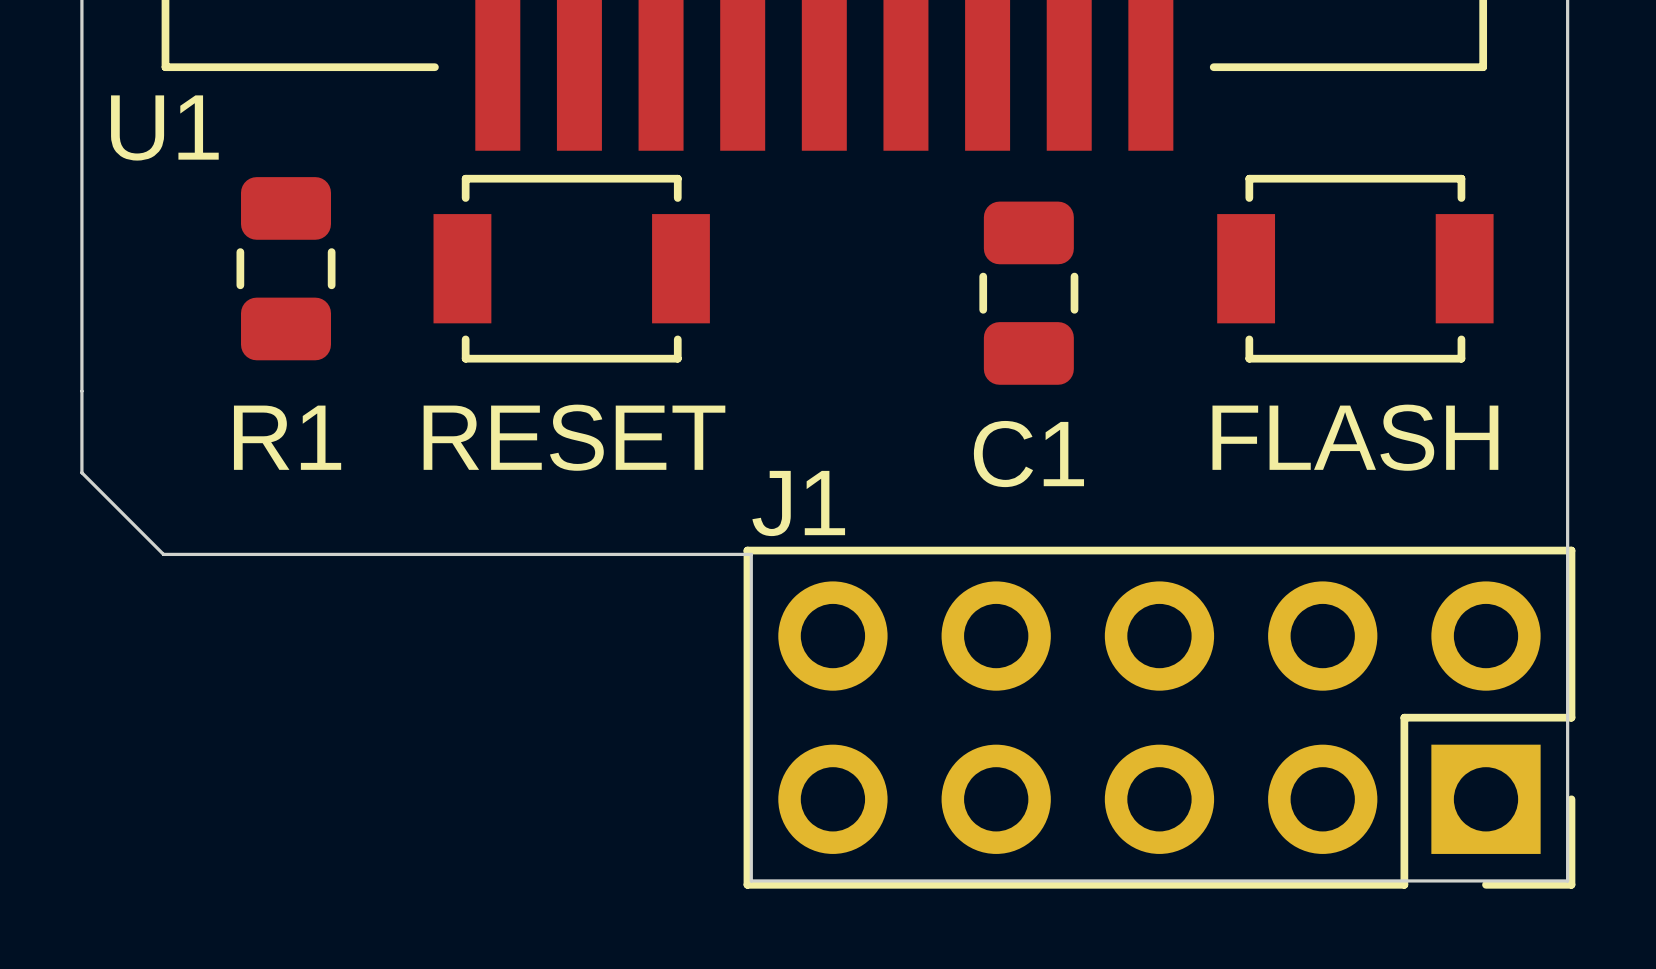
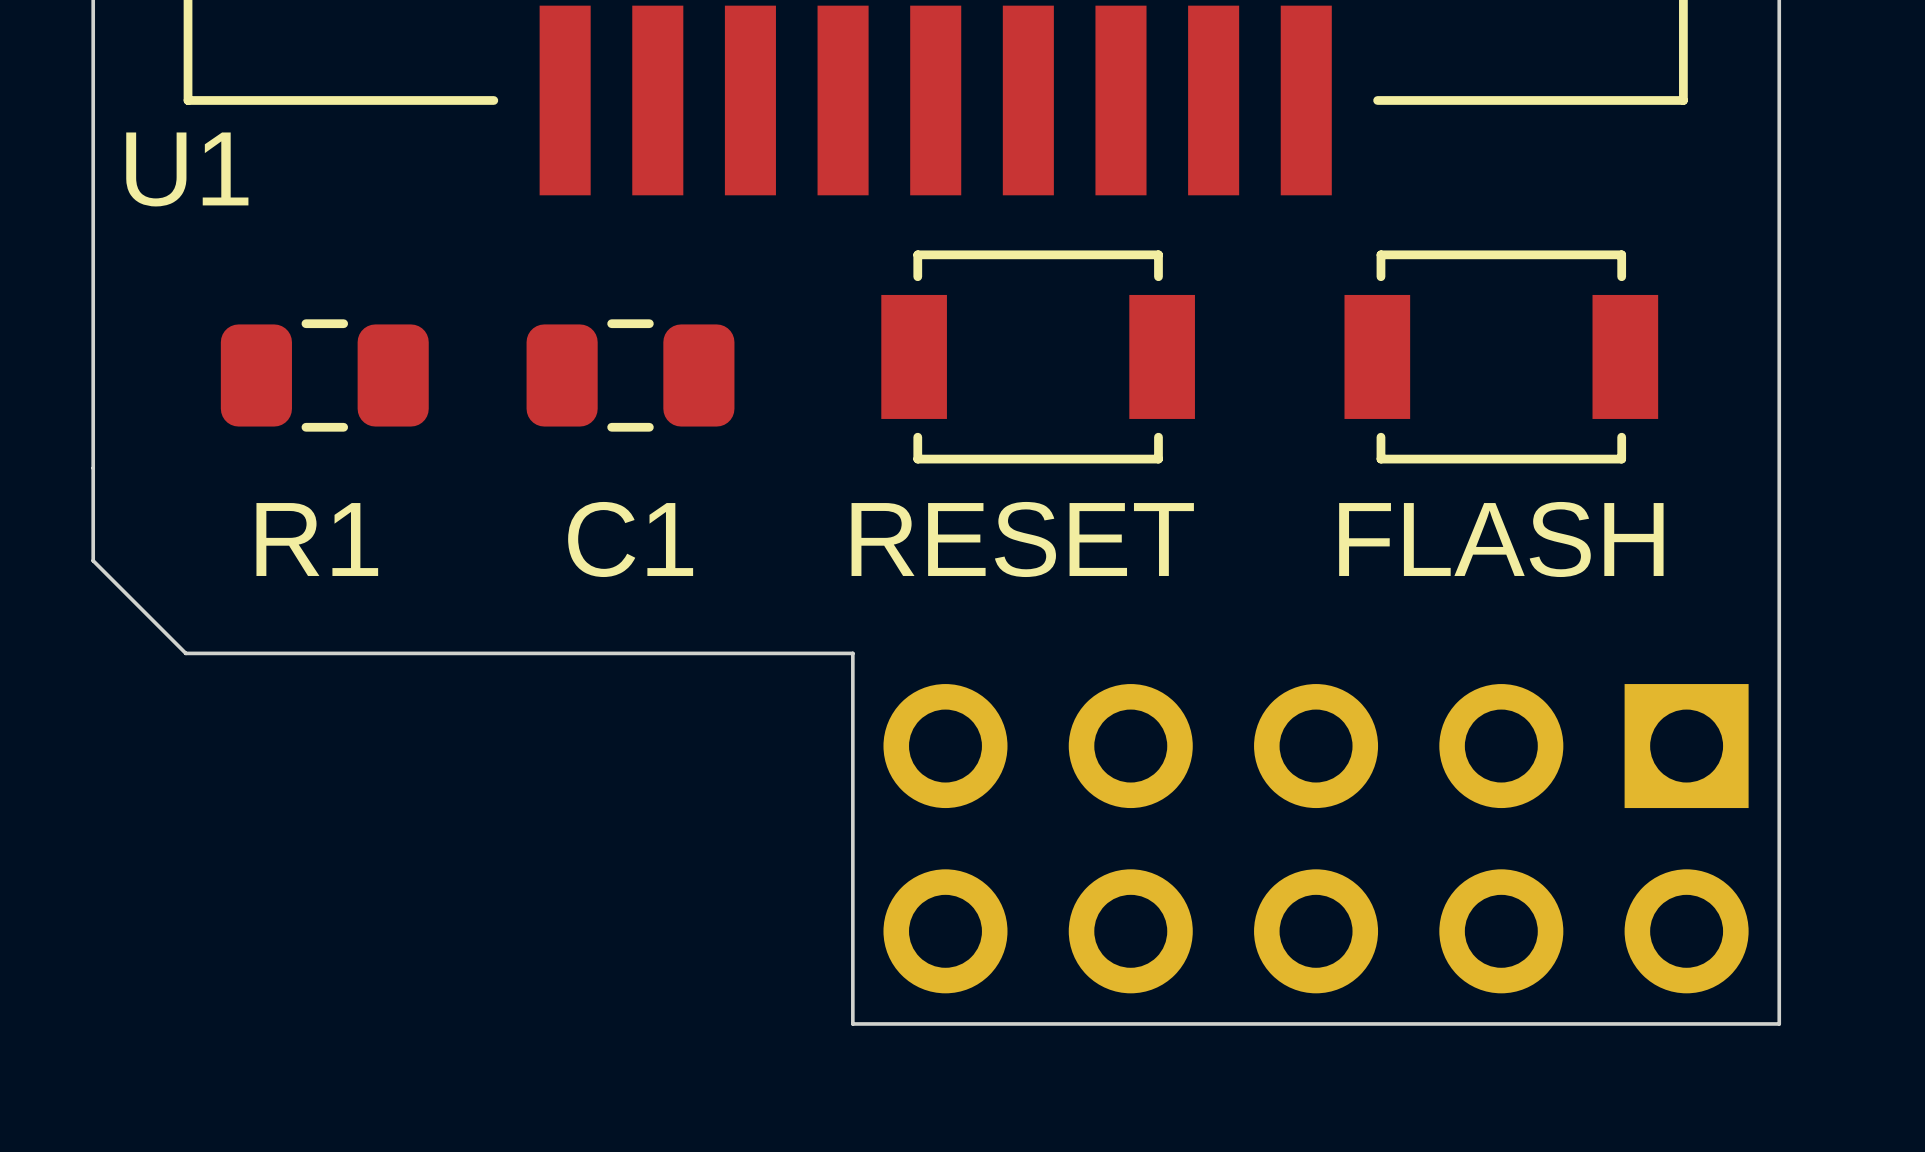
R1 rotation: 0° (286, 268) -> 90° clockwise (324, 375)
RESET position: (571, 268) -> (1038, 356)
FLASH position: (1355, 268) -> (1501, 356)
C1 rotation: 0° (1028, 293) -> 90° clockwise (630, 375)
C1 position: (1028, 293) -> (630, 375)
RESET name position: RESET (574, 437) -> RESET (1022, 539)
FLASH name position: FLASH (1355, 437) -> FLASH (1501, 539)
J1 side: top (1159, 717) -> bottom (1316, 838)

